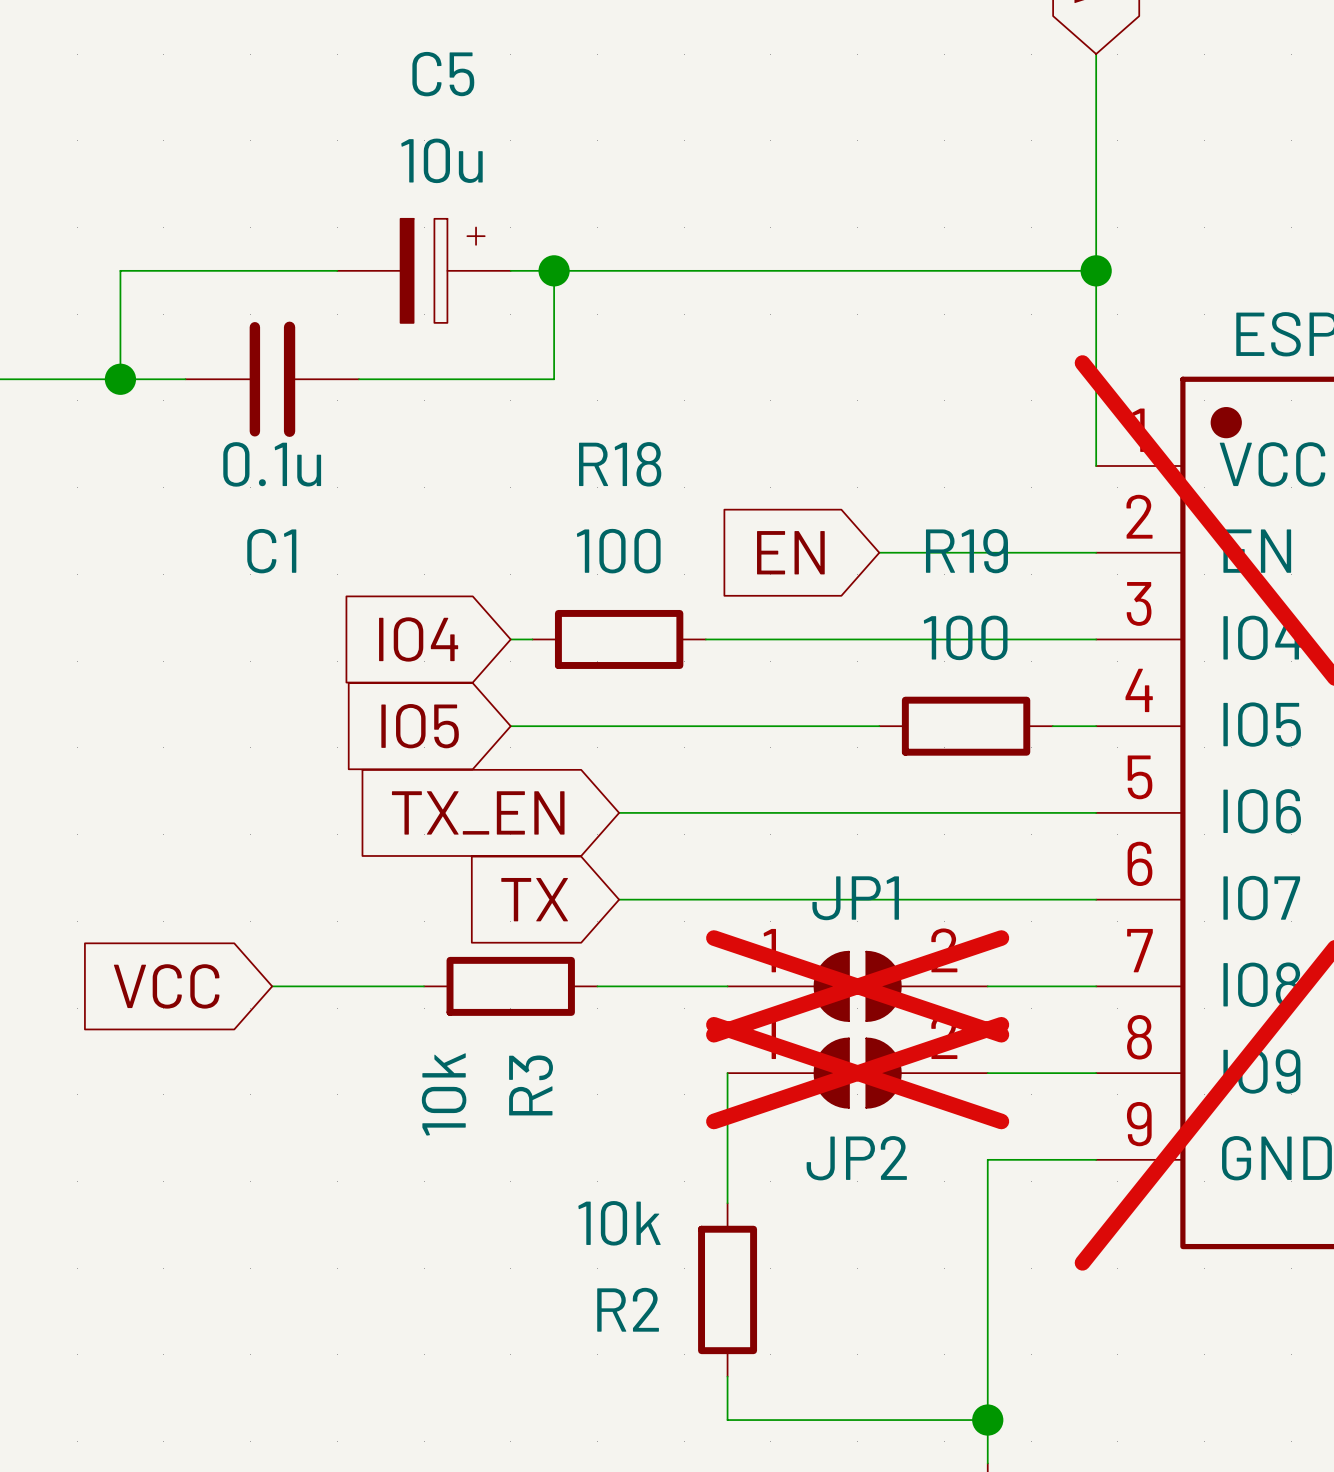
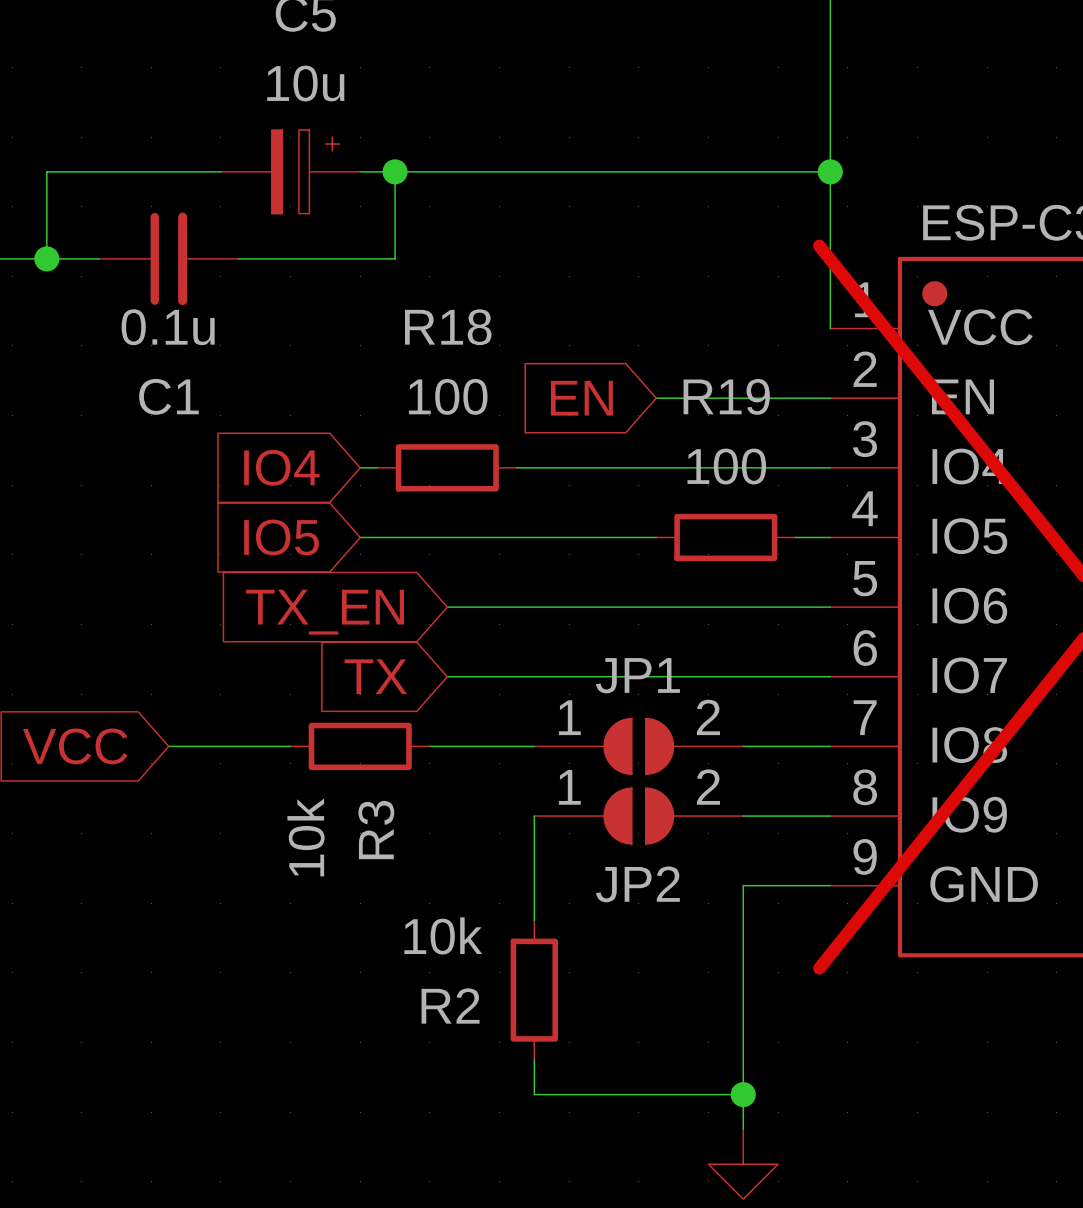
JP1 do-not-place cross: (857, 986) -> none
JP2 do-not-place cross: (857, 1073) -> none

